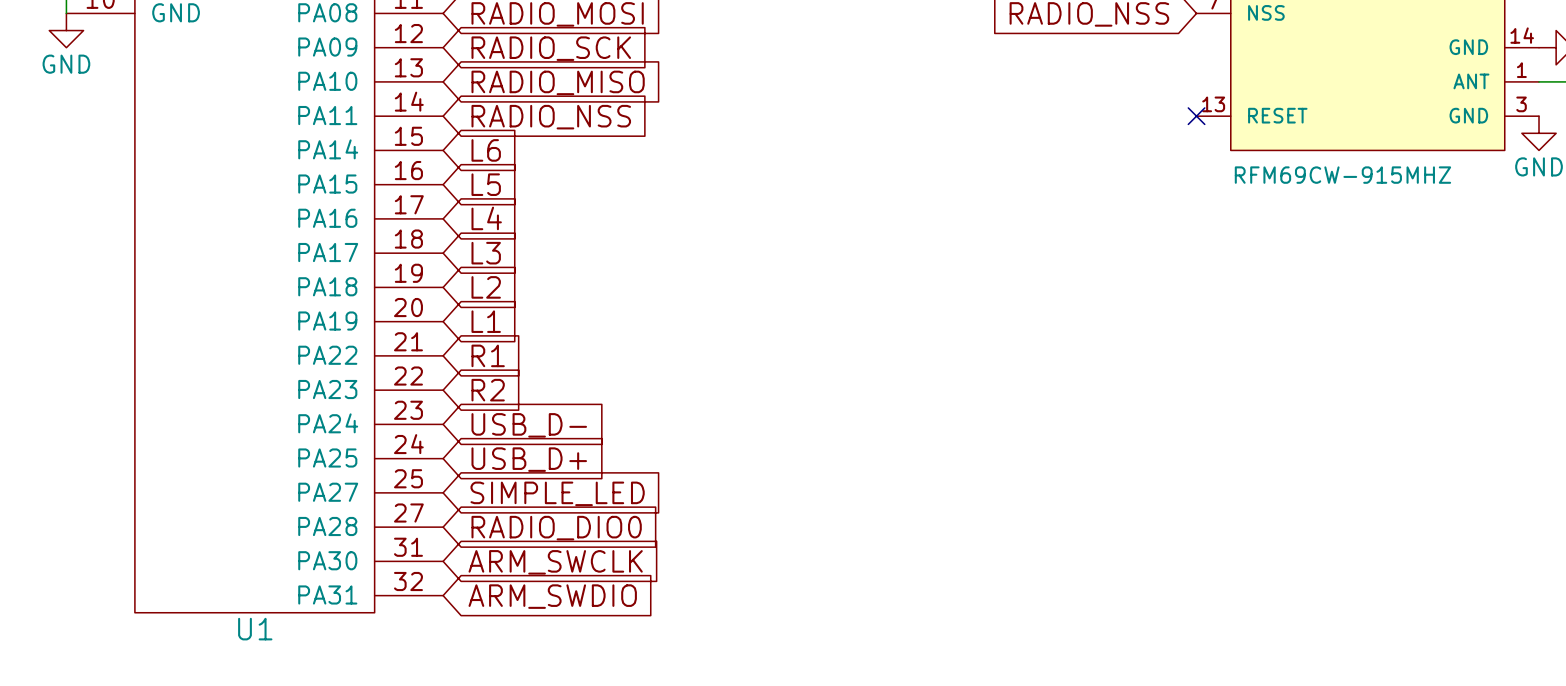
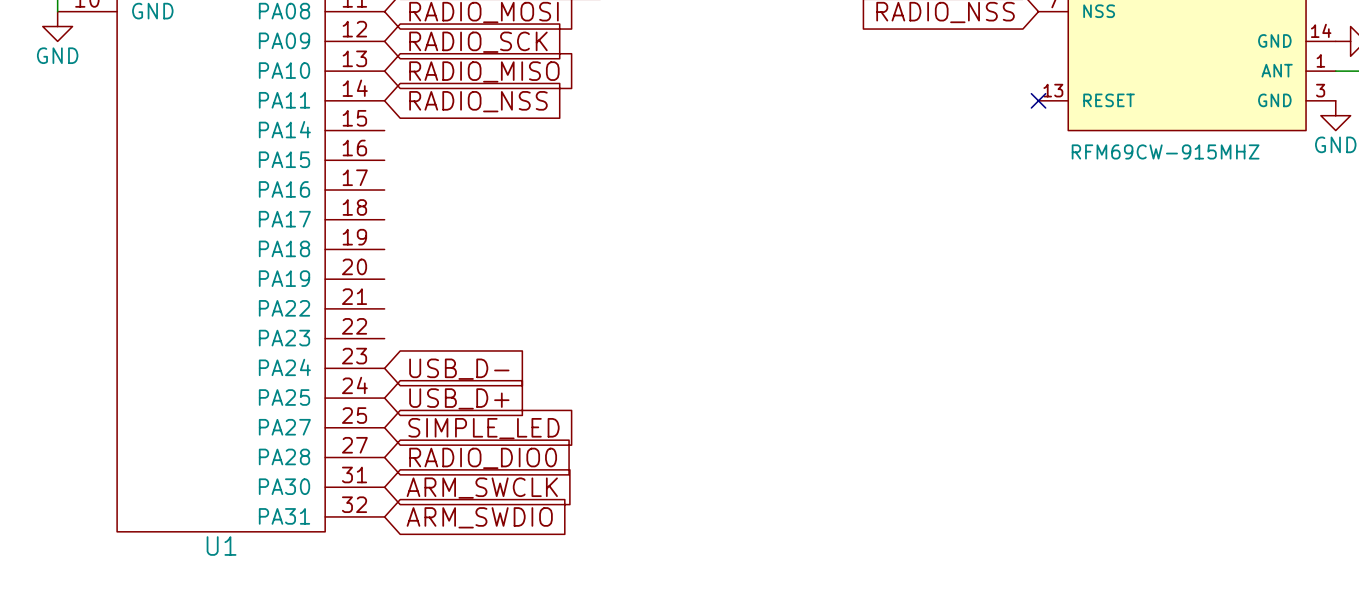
global label: L6 (486, 150) -> none
global label: L5 (486, 184) -> none
global label: L4 (486, 218) -> none
global label: L3 (486, 253) -> none
global label: L2 (486, 287) -> none
global label: L1 (486, 321) -> none
global label: R1 (488, 355) -> none
global label: R2 (488, 390) -> none

